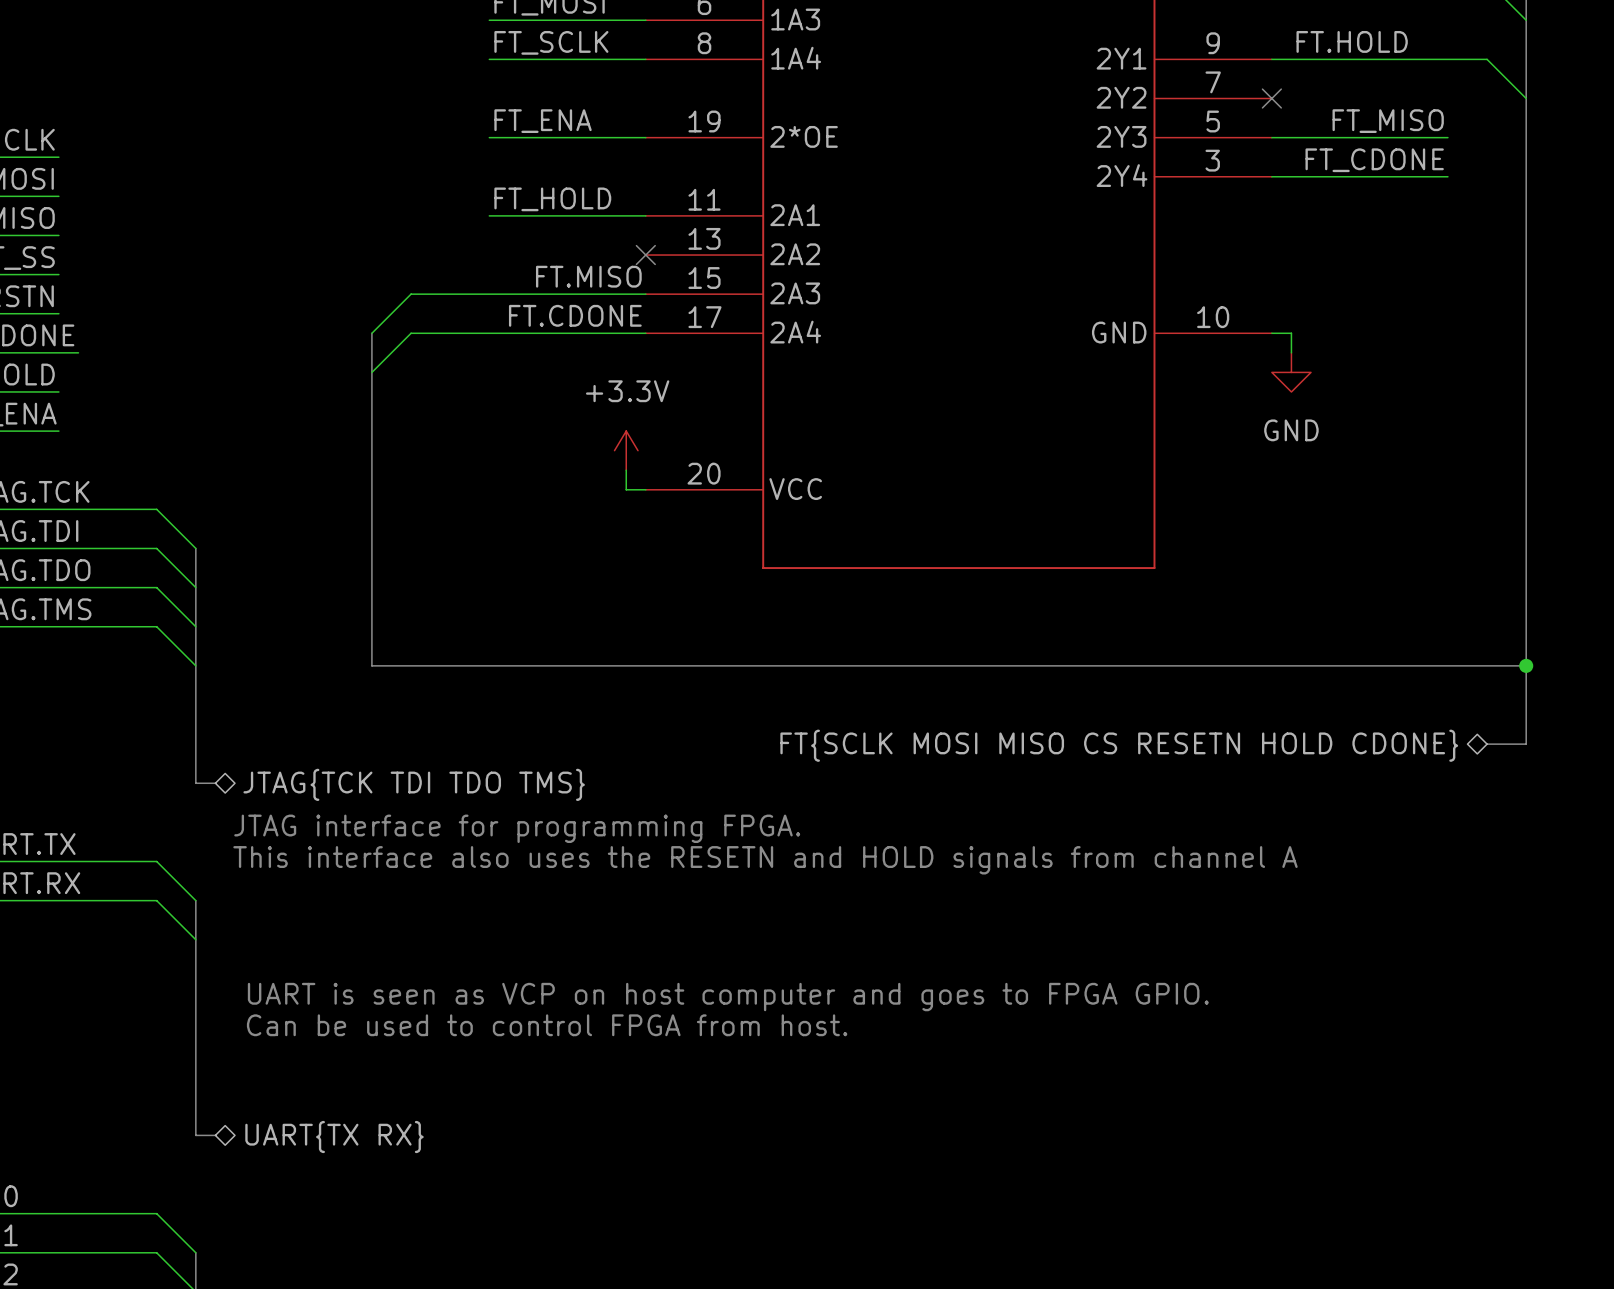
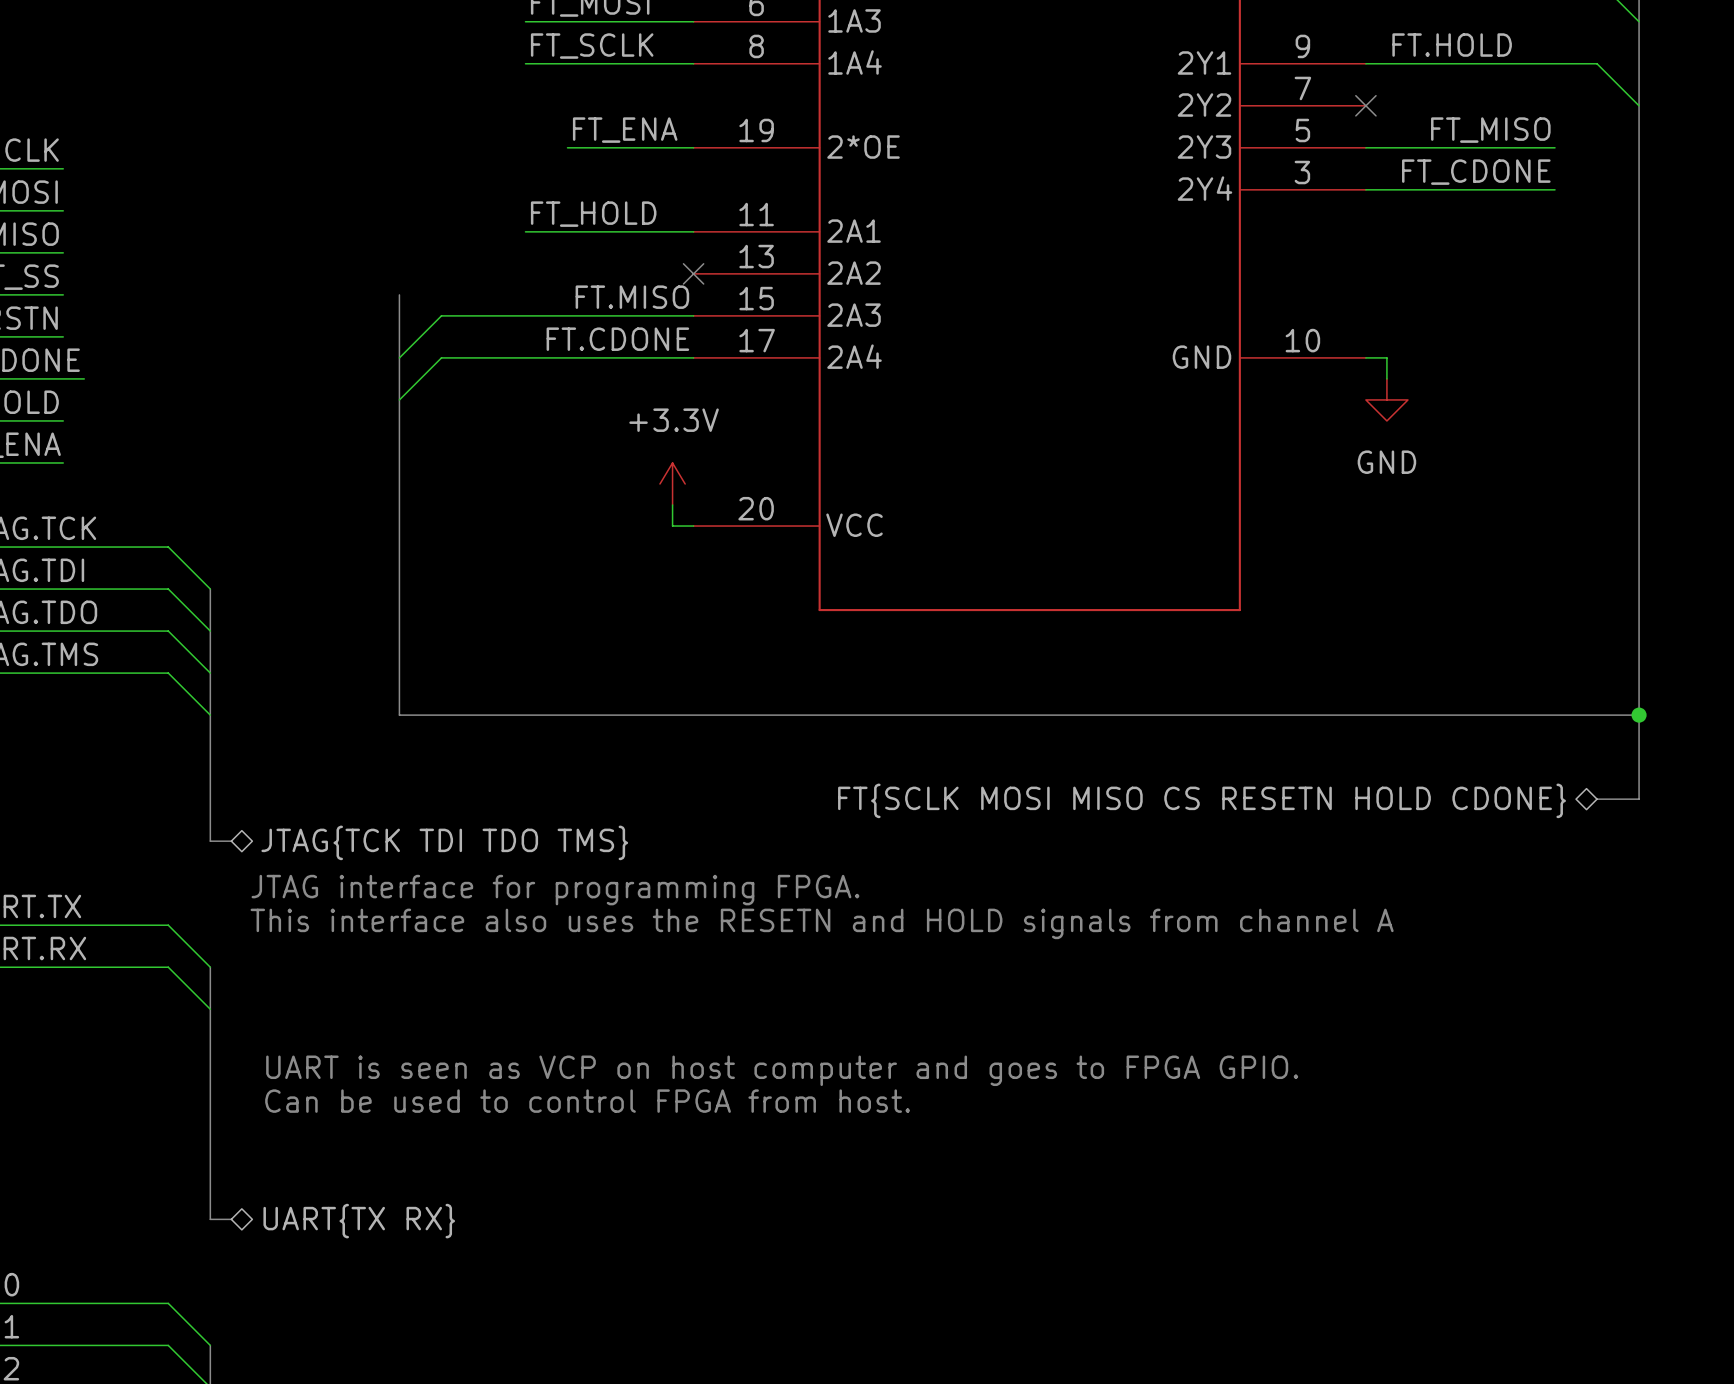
label position: FT_ENA (543, 121) -> FT_ENA (625, 130)
wire: (489, 137) (528, 137) -> none
bus: none -> (399, 294) (399, 357)

